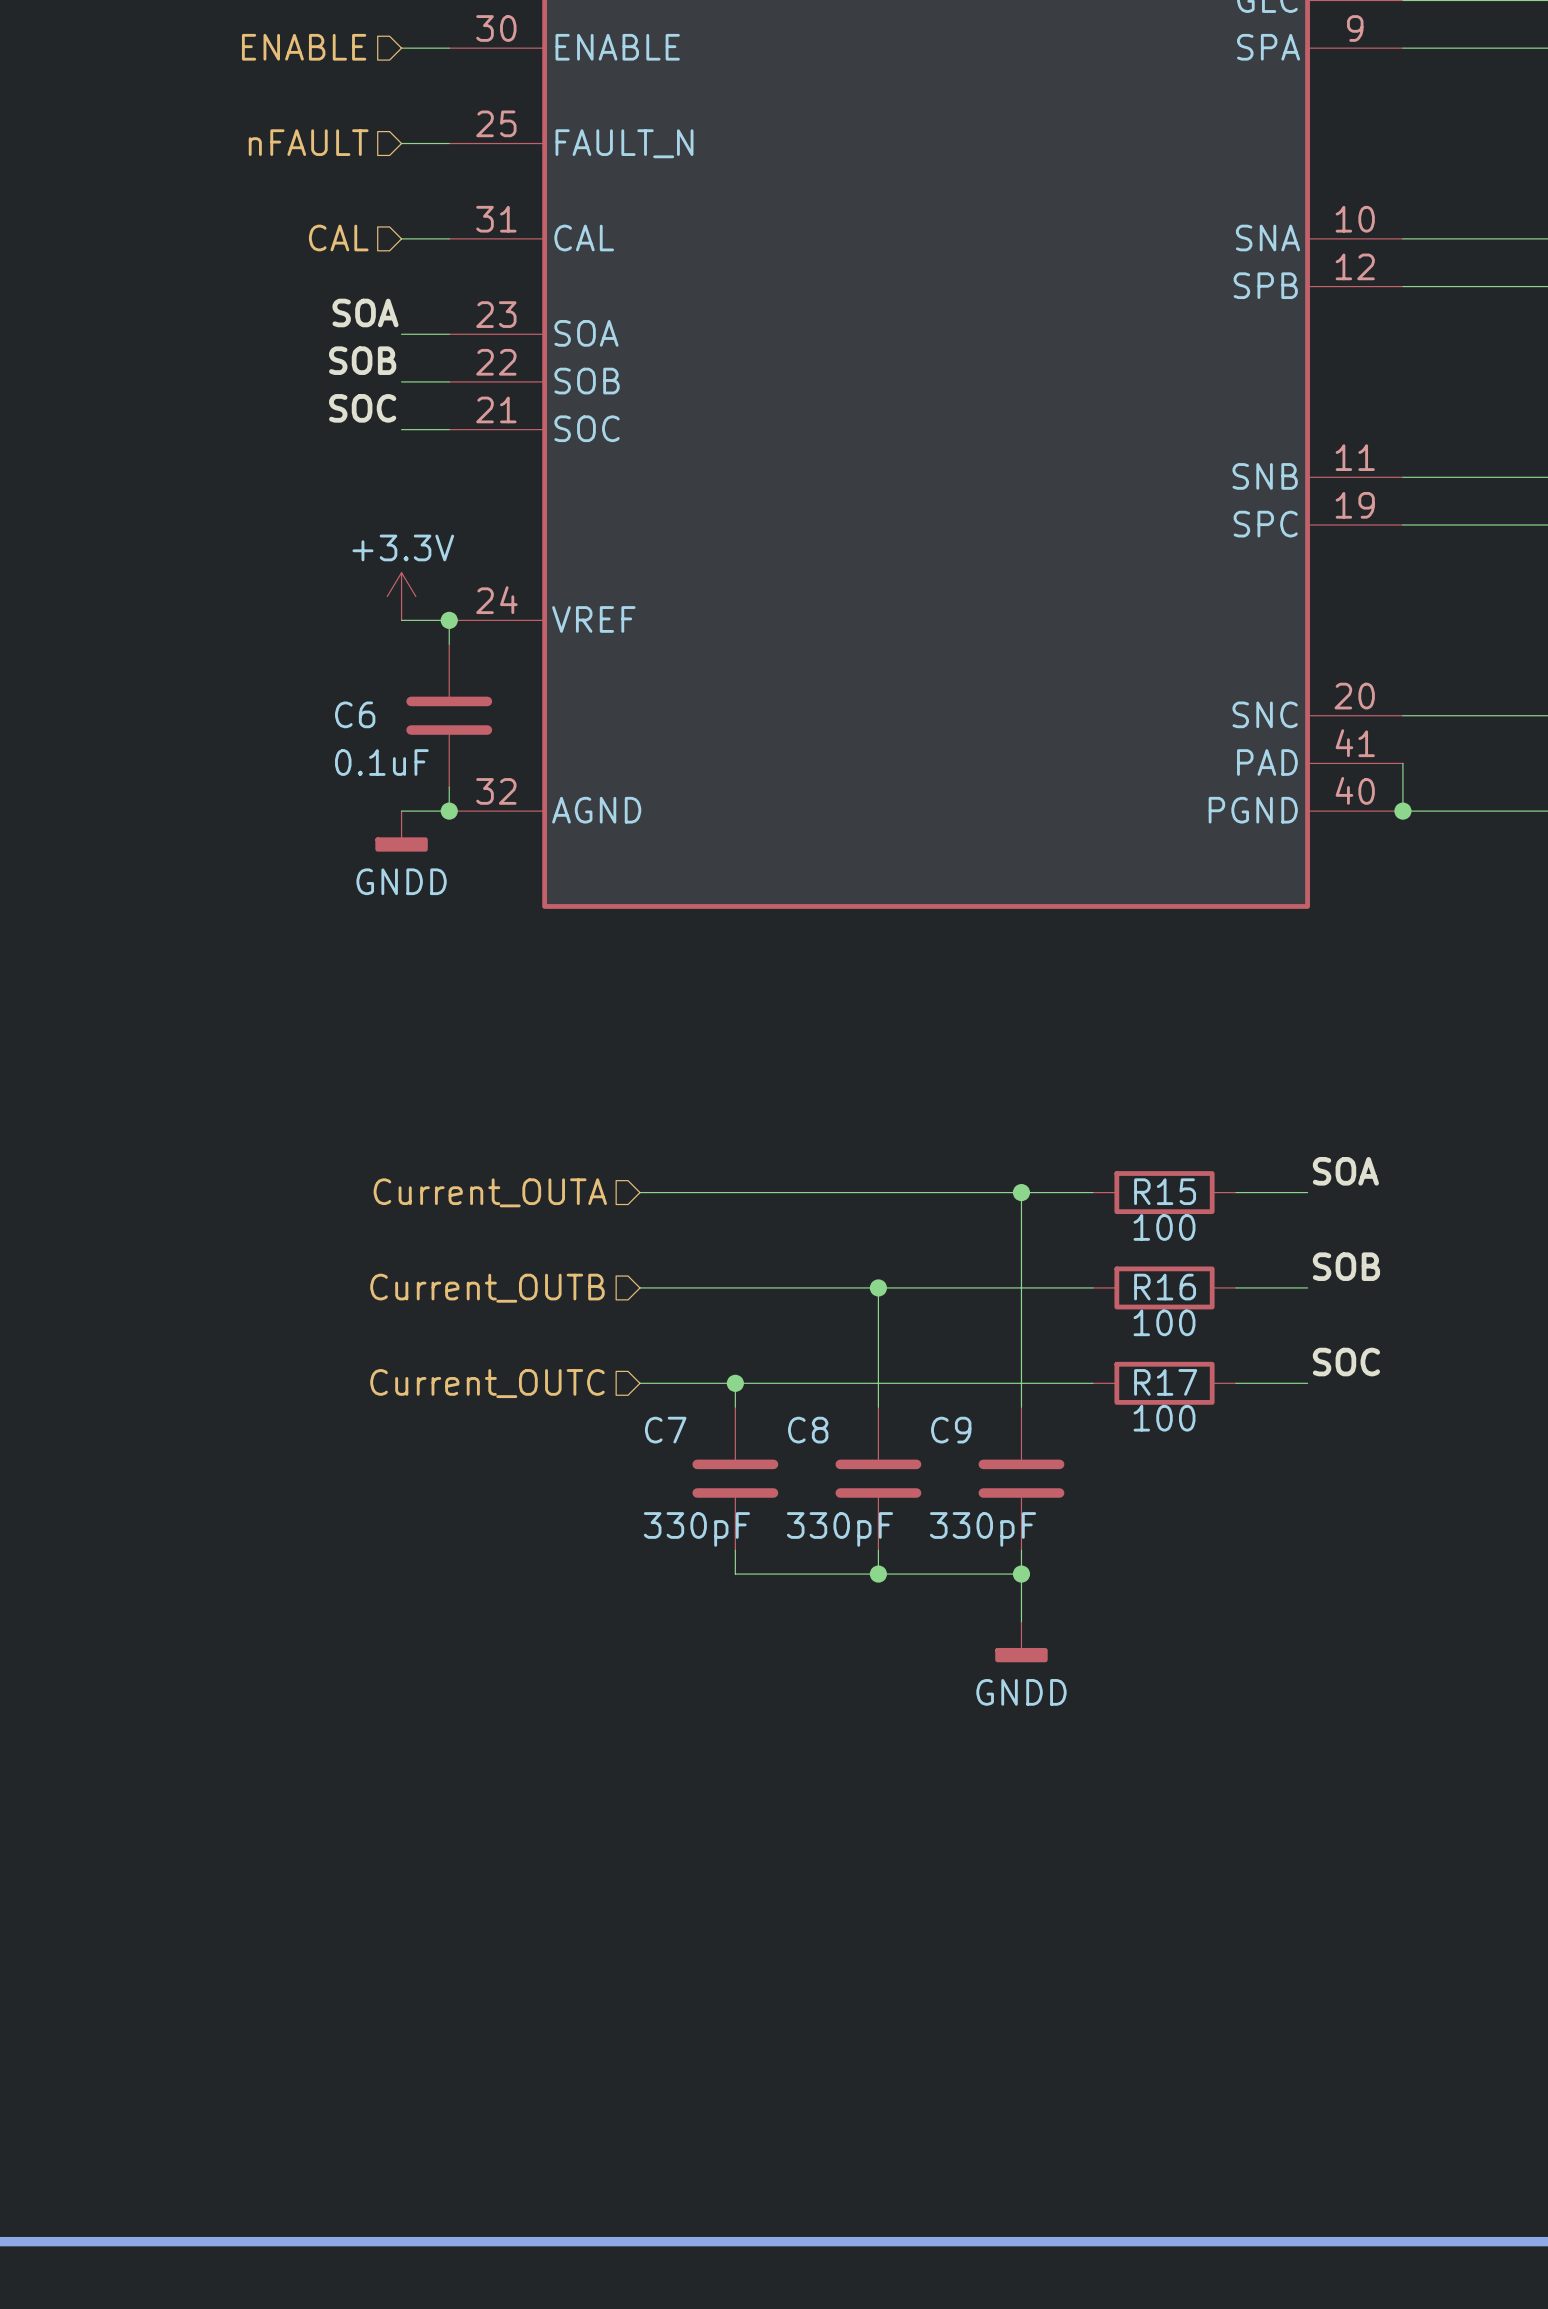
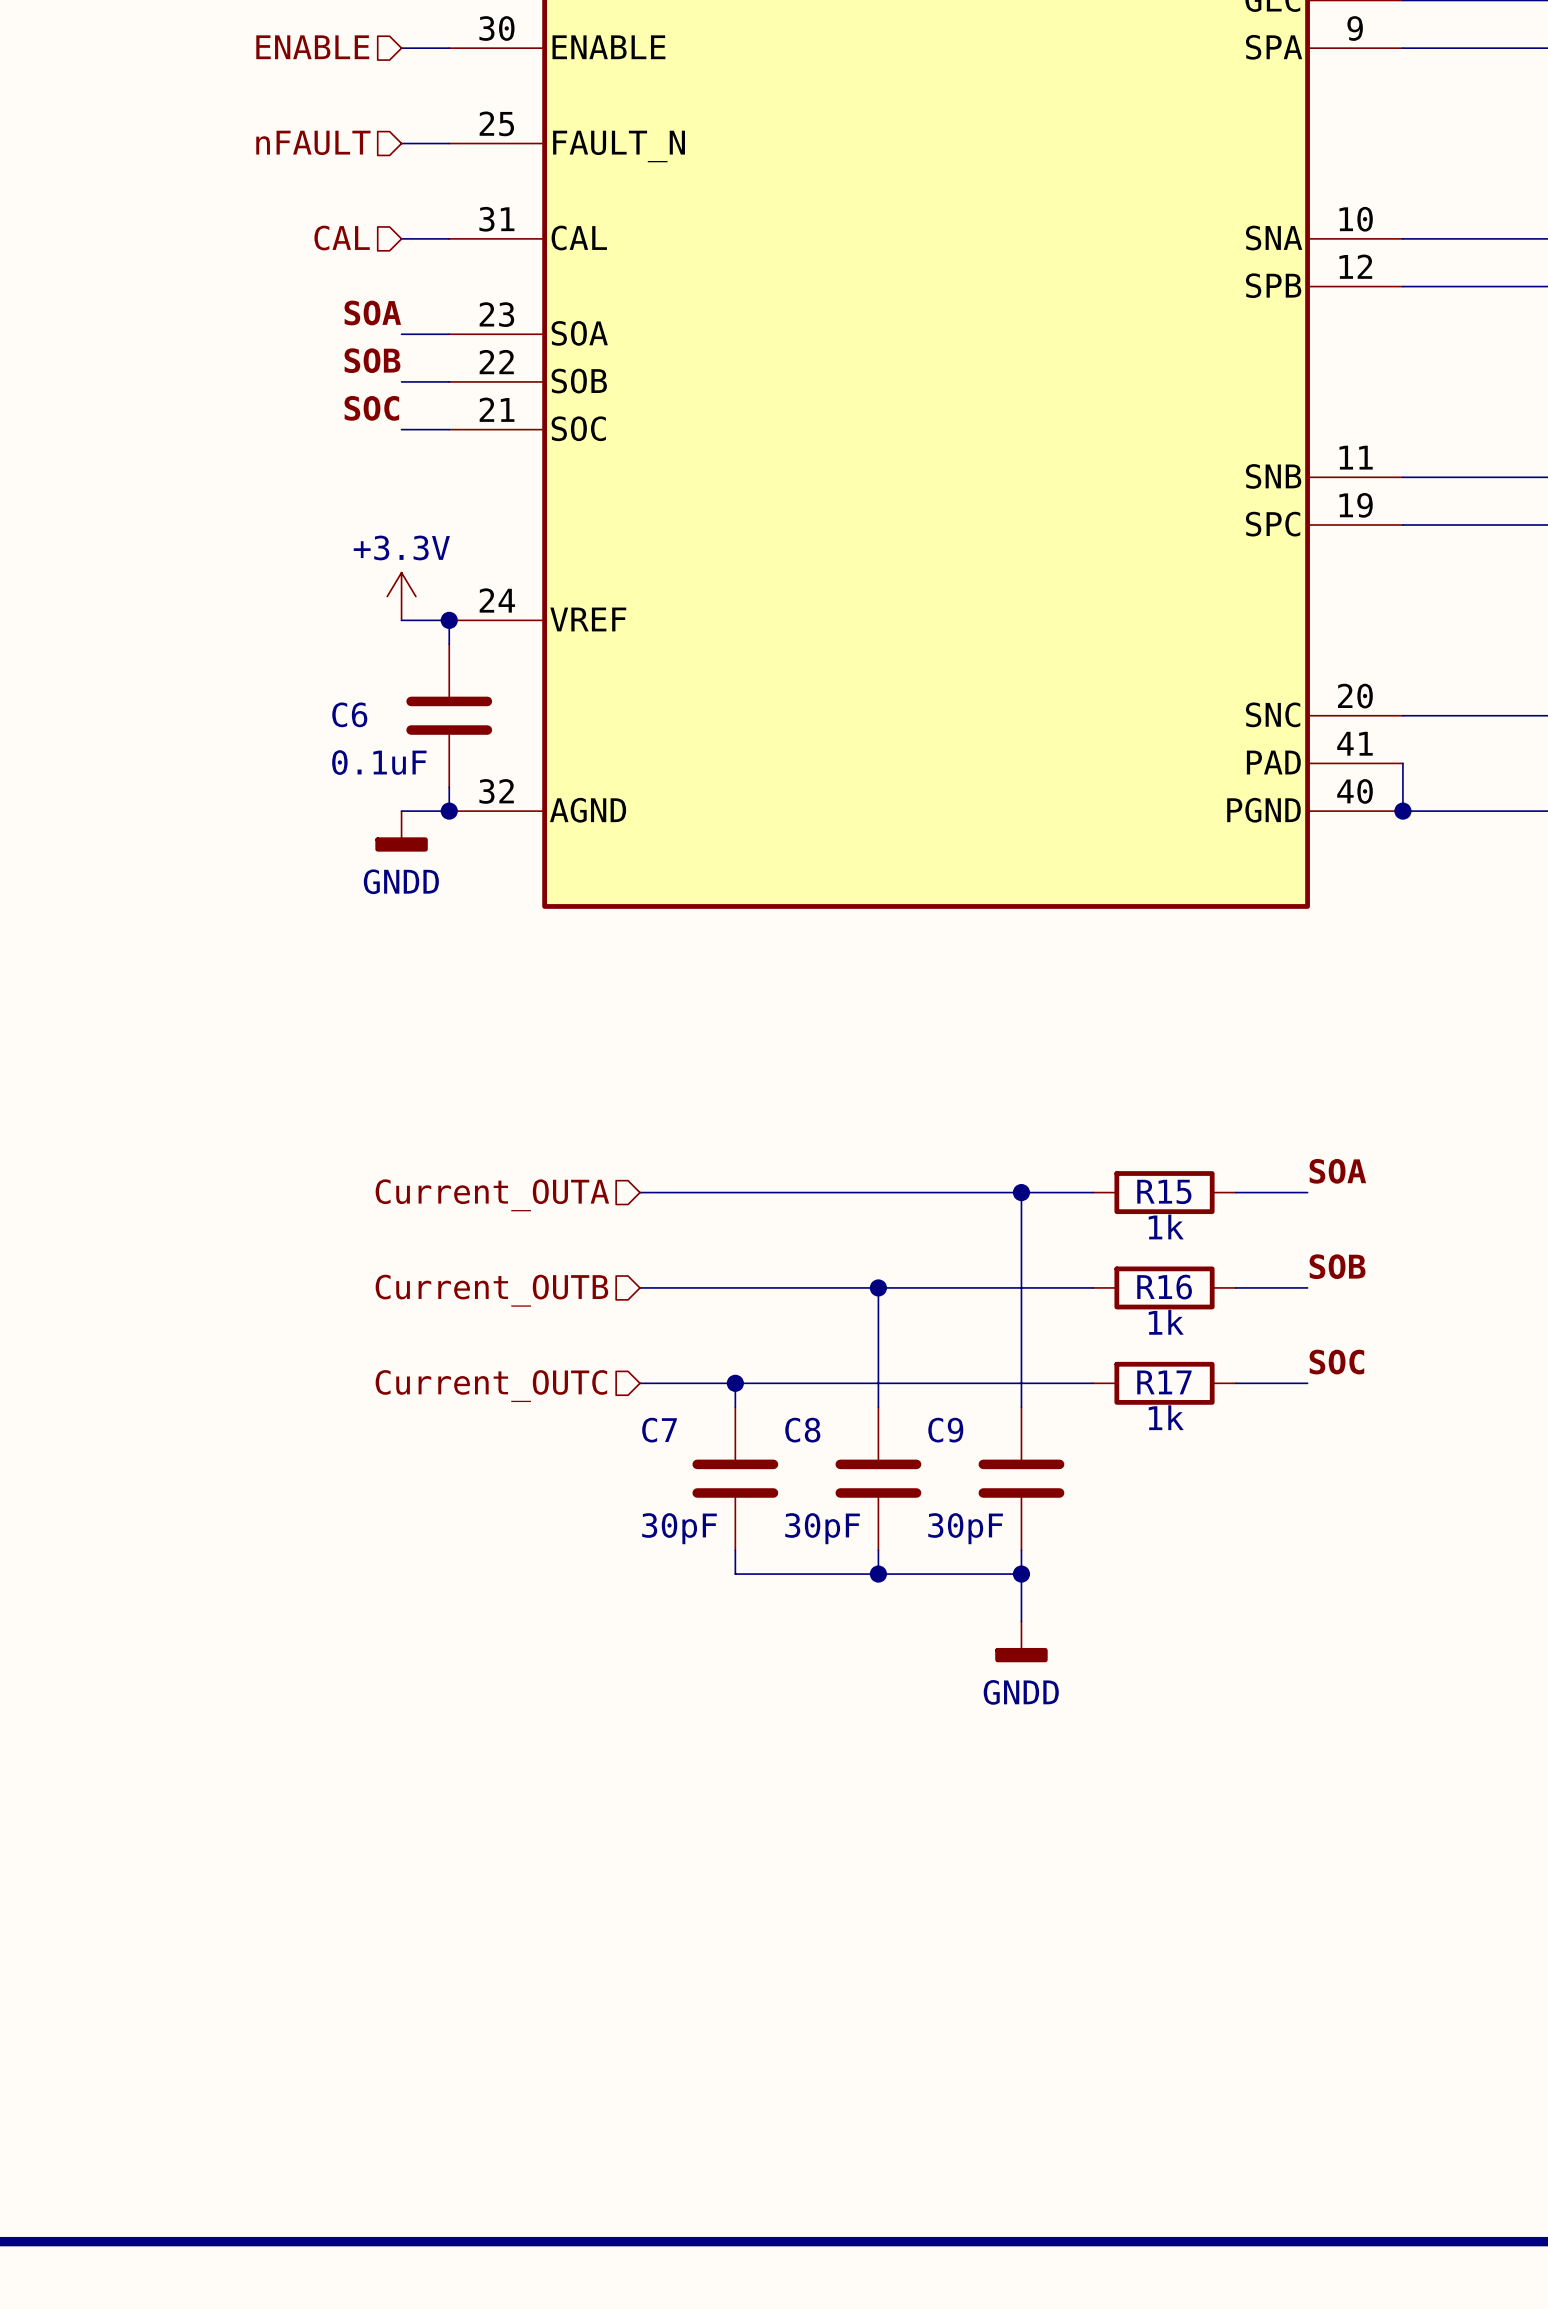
R15 value: 100 (1164, 1227) -> 1k (1166, 1226)
R16 value: 100 (1164, 1322) -> 1k (1166, 1322)
R17 value: 100 (1164, 1418) -> 1k (1166, 1417)
C7 value: 330pF (696, 1529) -> 30pF (679, 1528)
C8 value: 330pF (839, 1529) -> 30pF (822, 1528)
C9 value: 330pF (983, 1529) -> 30pF (965, 1528)

